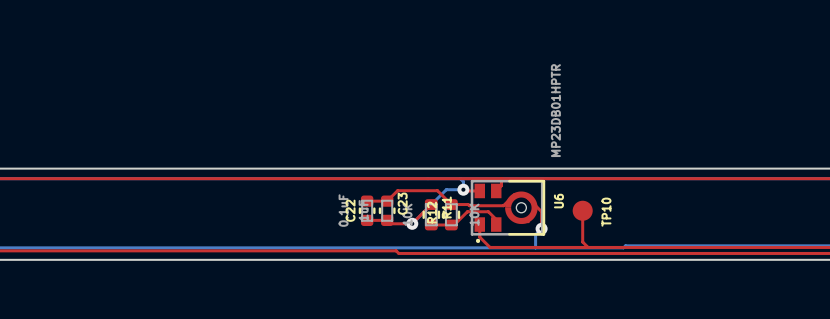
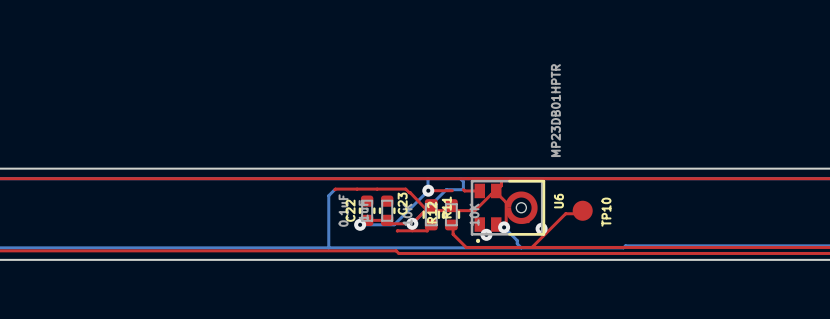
bottom track: none -> (428, 178) (428, 190) (394, 224) (360, 224)
top track: none -> (334, 189) (405, 189) (427, 210) (474, 210) (491, 194) (497, 194) (506, 202) (506, 225) (504, 227)
bottom track: none -> (334, 189) (328, 195) (328, 247)
via: (463, 189) -> none
top track: (428, 190) (397, 190) (387, 201) (367, 201) -> none
via: none -> (428, 190)
top track: (437, 190) (451, 204) (469, 205) (503, 205) (514, 194) (524, 194) (541, 211) (541, 228) -> (437, 190) (452, 190)
top track: (582, 210) (582, 242) (588, 247) -> none
top track: none -> (585, 213) (565, 213) (531, 247)
via: none -> (360, 224)
top track: (479, 224) (479, 237) (490, 247) -> (453, 224) (453, 234) (466, 247) (490, 247)
top track: (496, 224) (496, 219) (488, 211) (467, 211) (454, 224) (431, 224) -> none
bottom track: none -> (504, 227) (517, 240) (517, 243) (521, 247)
via: none -> (504, 227)
bottom track: (541, 228) (535, 234) (535, 247) -> none
top track: none -> (397, 231) (427, 231)
via: none -> (486, 234)

